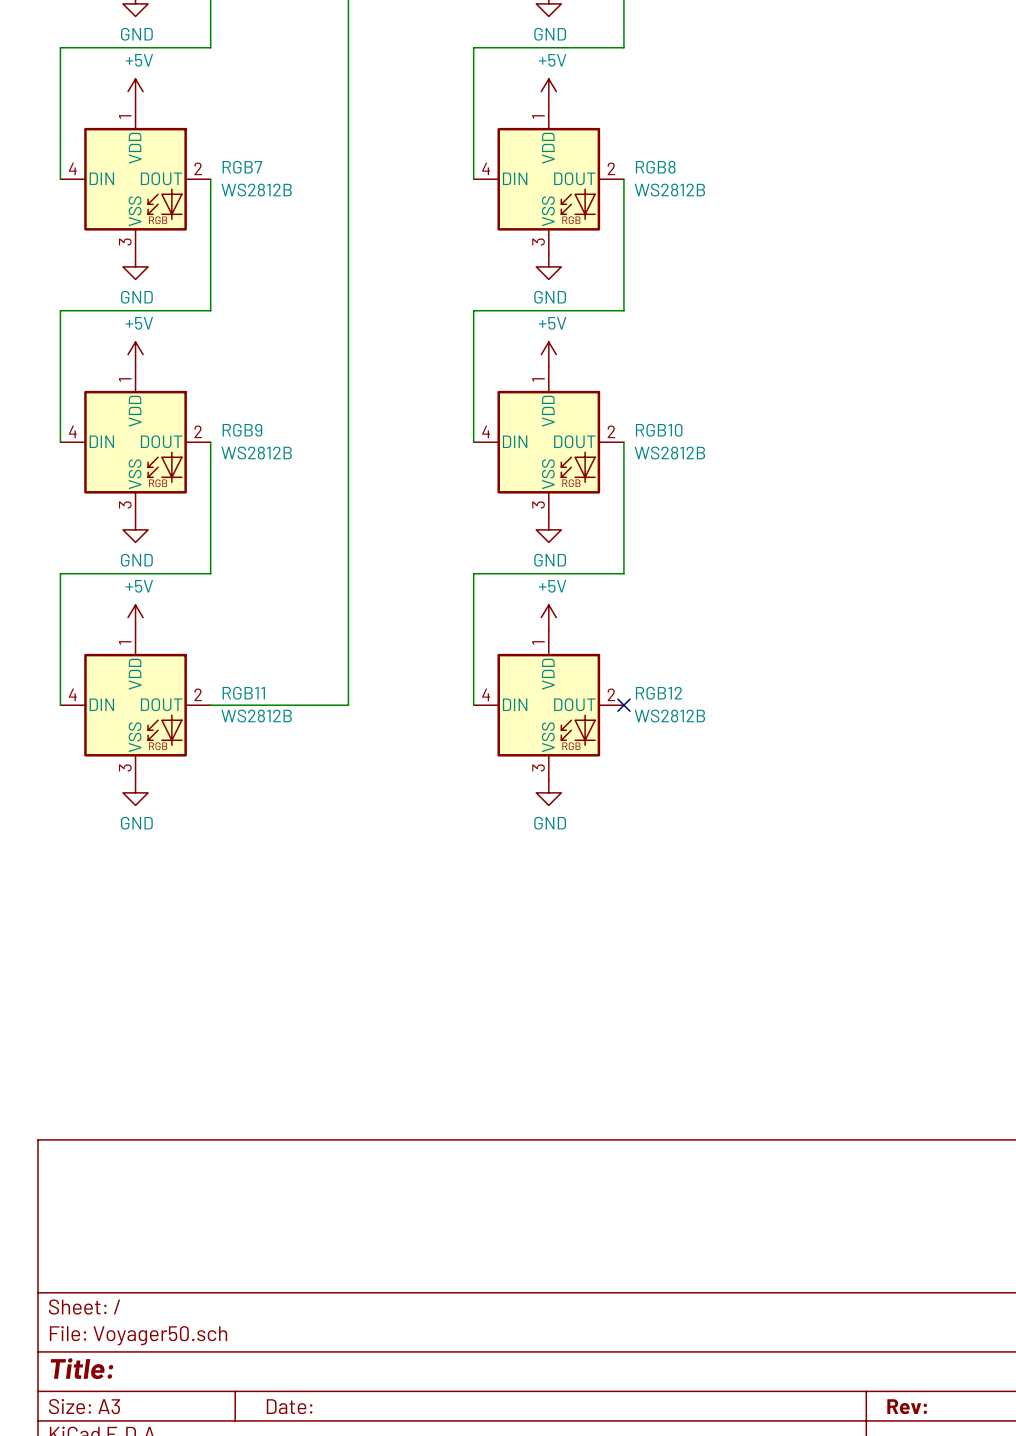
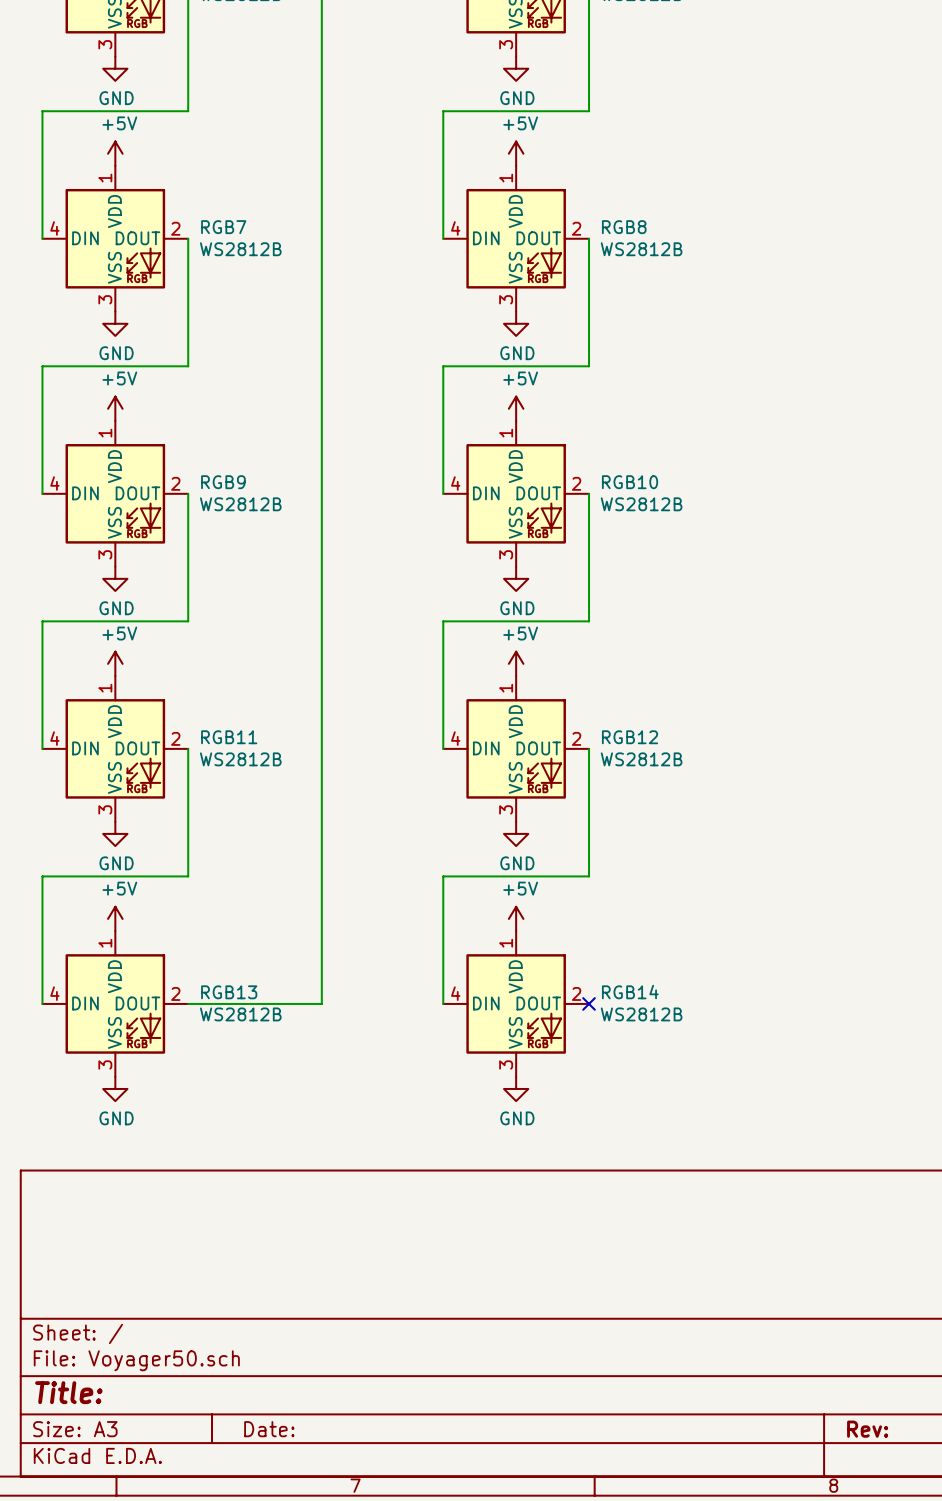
wire: (210, 705) (348, 705) -> (188, 1003) (321, 1003) (321, 748)
wire: none -> (188, 748) (188, 876) (42, 876) (42, 1003)
wire: none -> (589, 748) (589, 876) (443, 876) (443, 1003)
no-connect mark: (623, 705) -> none
power symbol: none -> +5V (115, 918)
power symbol: none -> +5V (516, 918)
RGB13: none -> WS2812B (115, 1003)
RGB14: none -> WS2812B (516, 1003)
no-connect mark: none -> (589, 1003)
power symbol: none -> GND (115, 1088)
power symbol: none -> GND (516, 1088)

